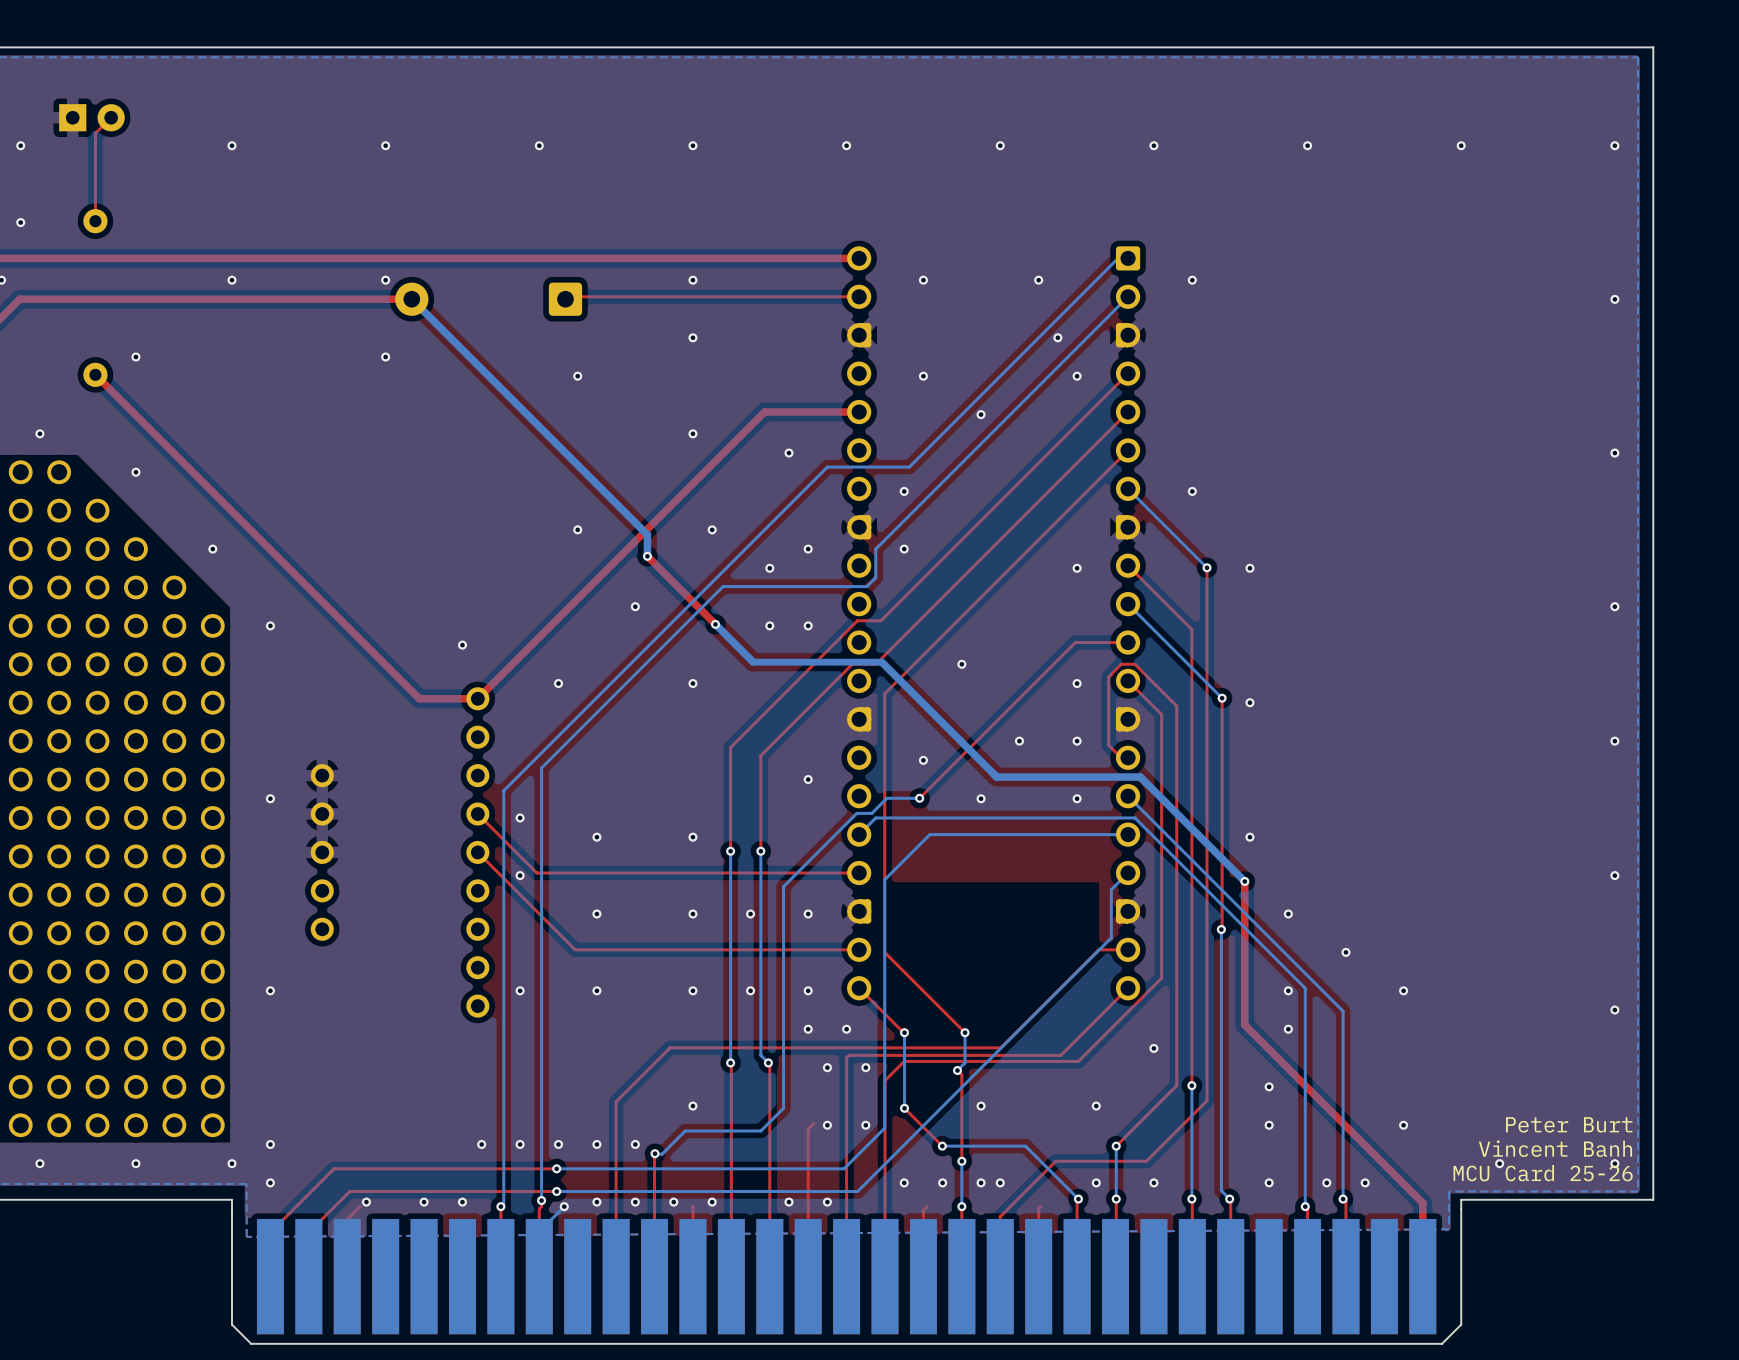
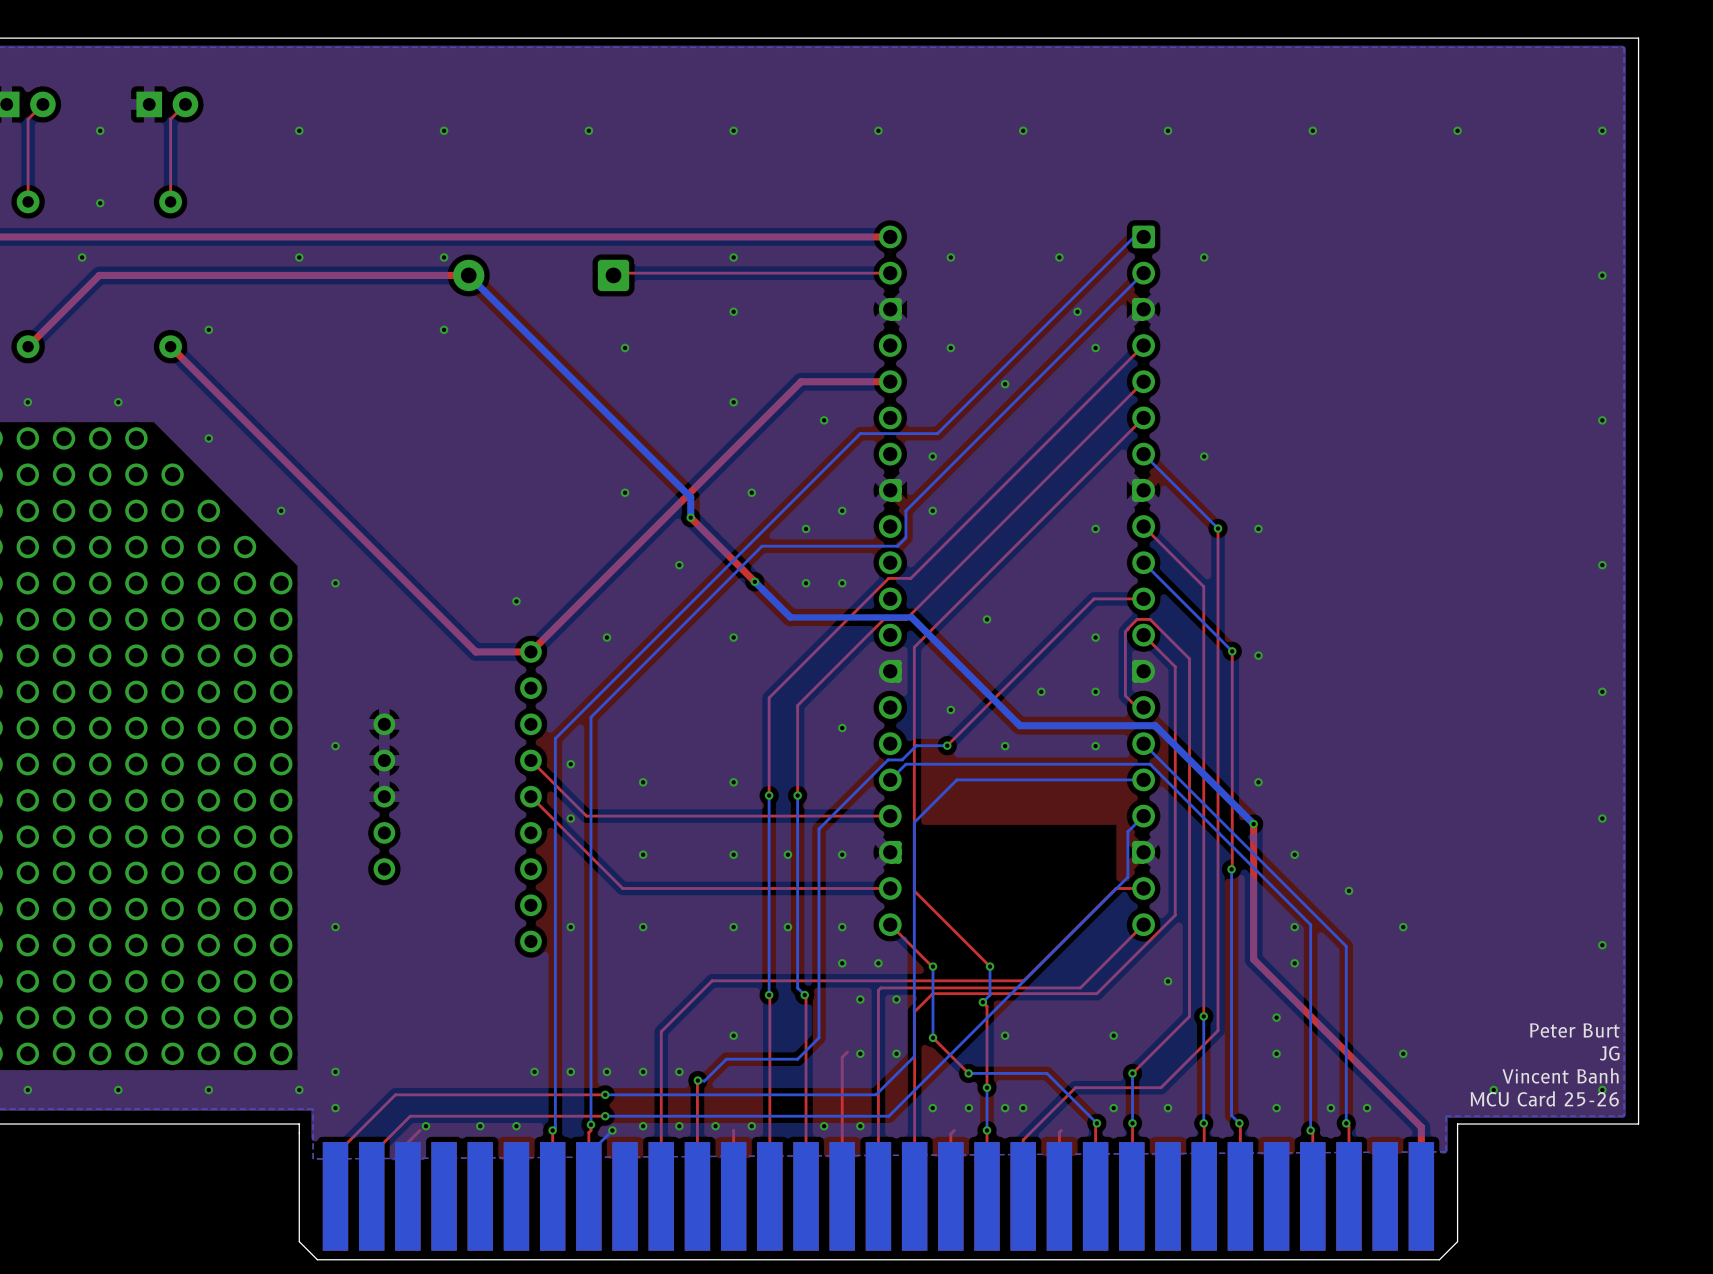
text: none -> Peter Burt (1574, 1030)
text: Peter Burt (1569, 1124) -> JG (1609, 1053)

